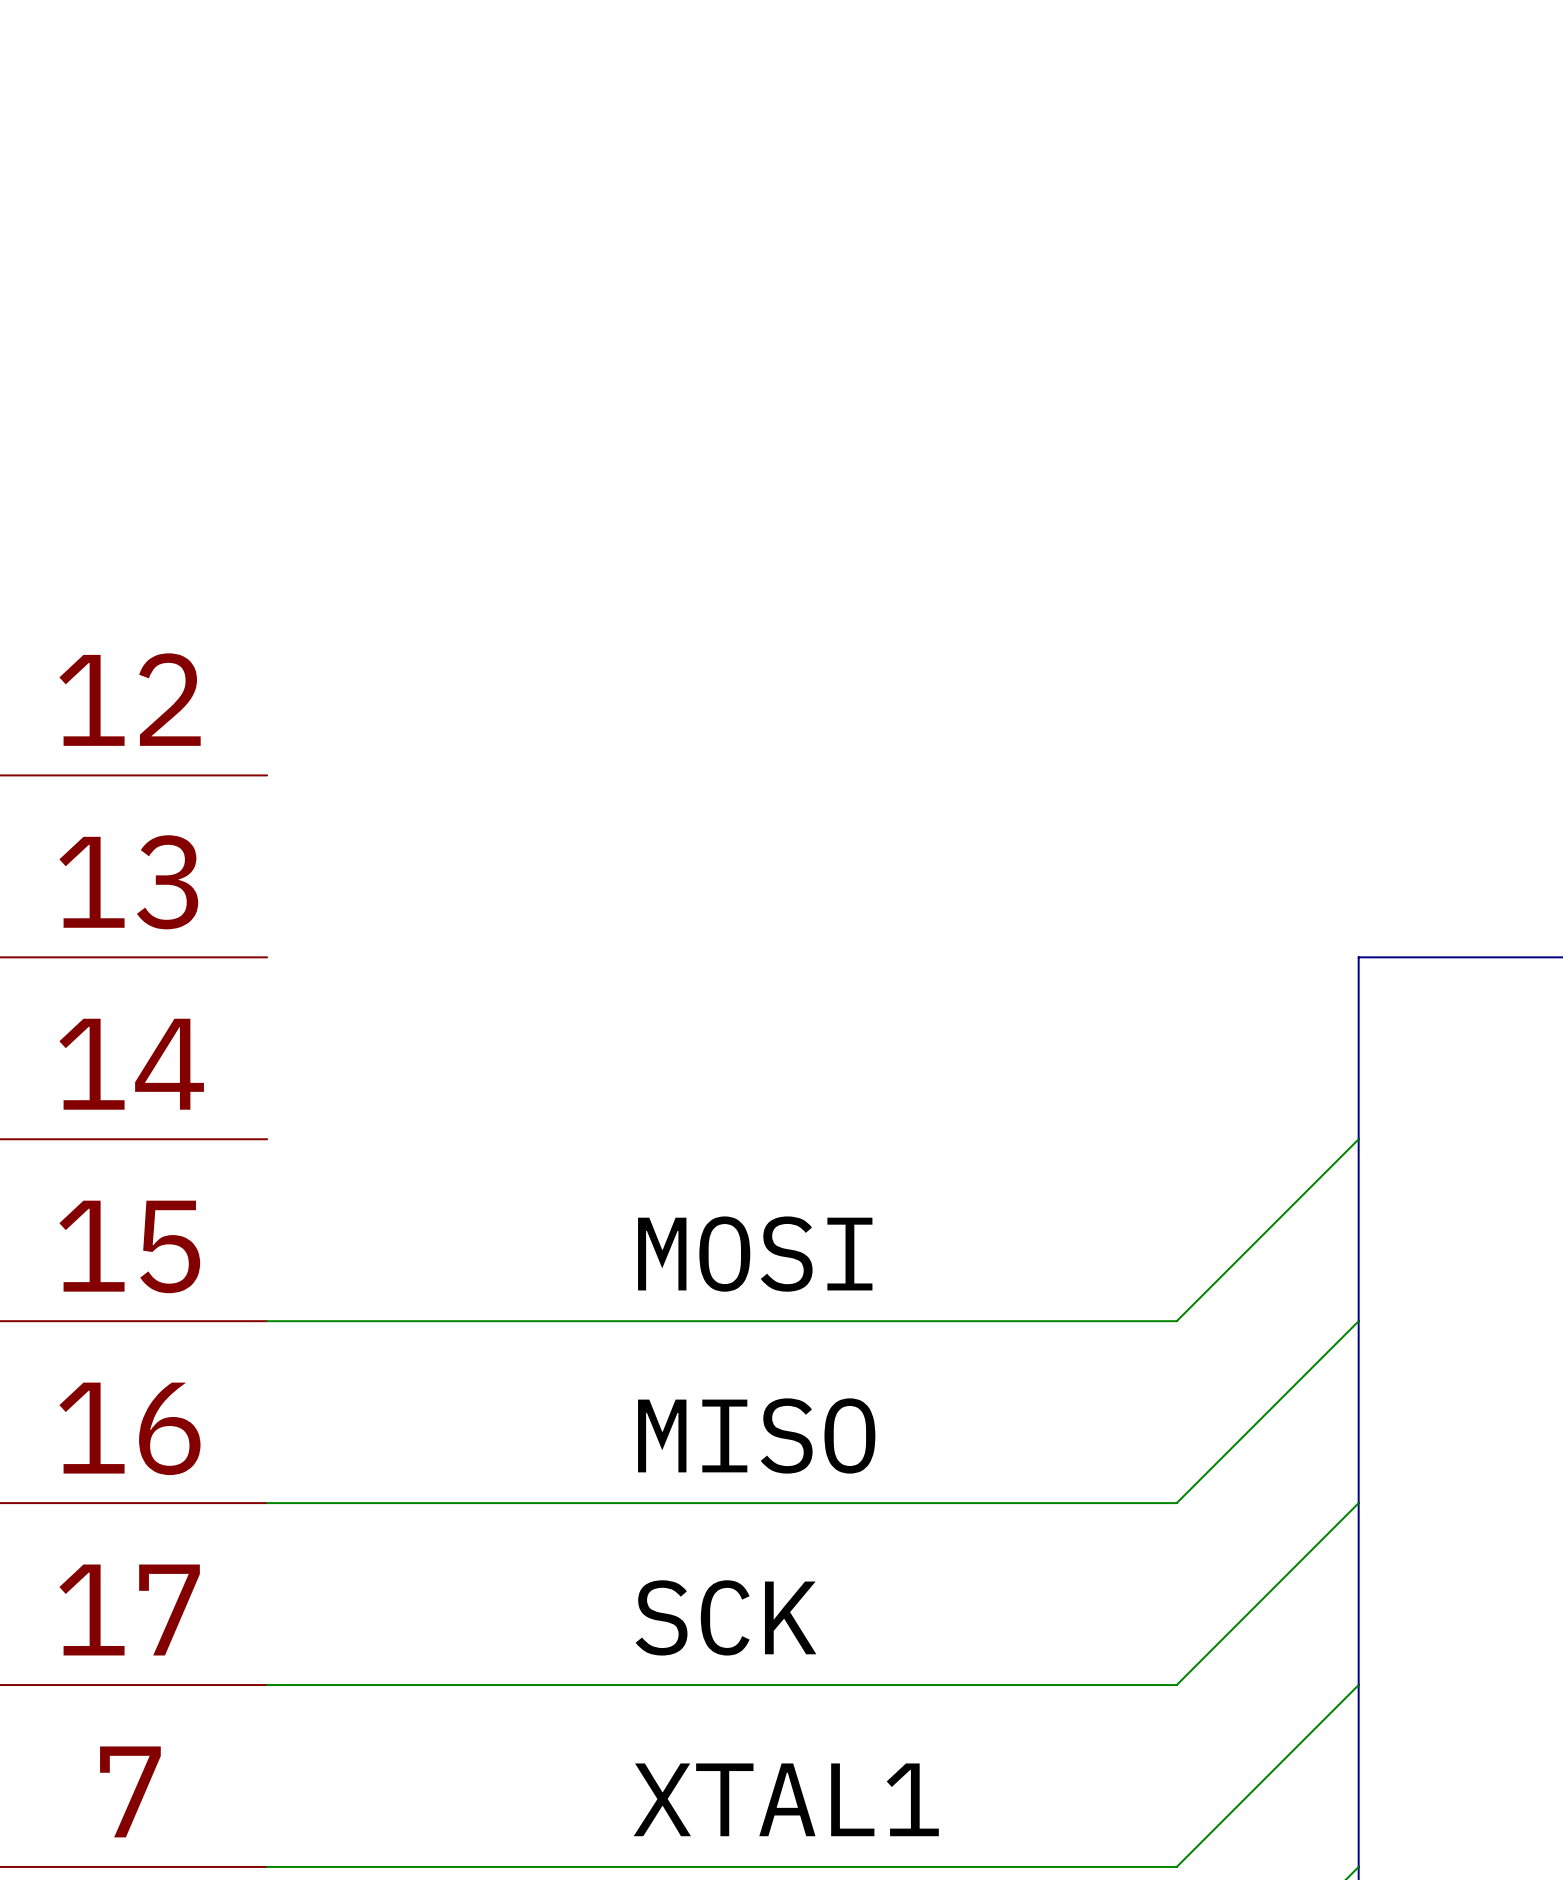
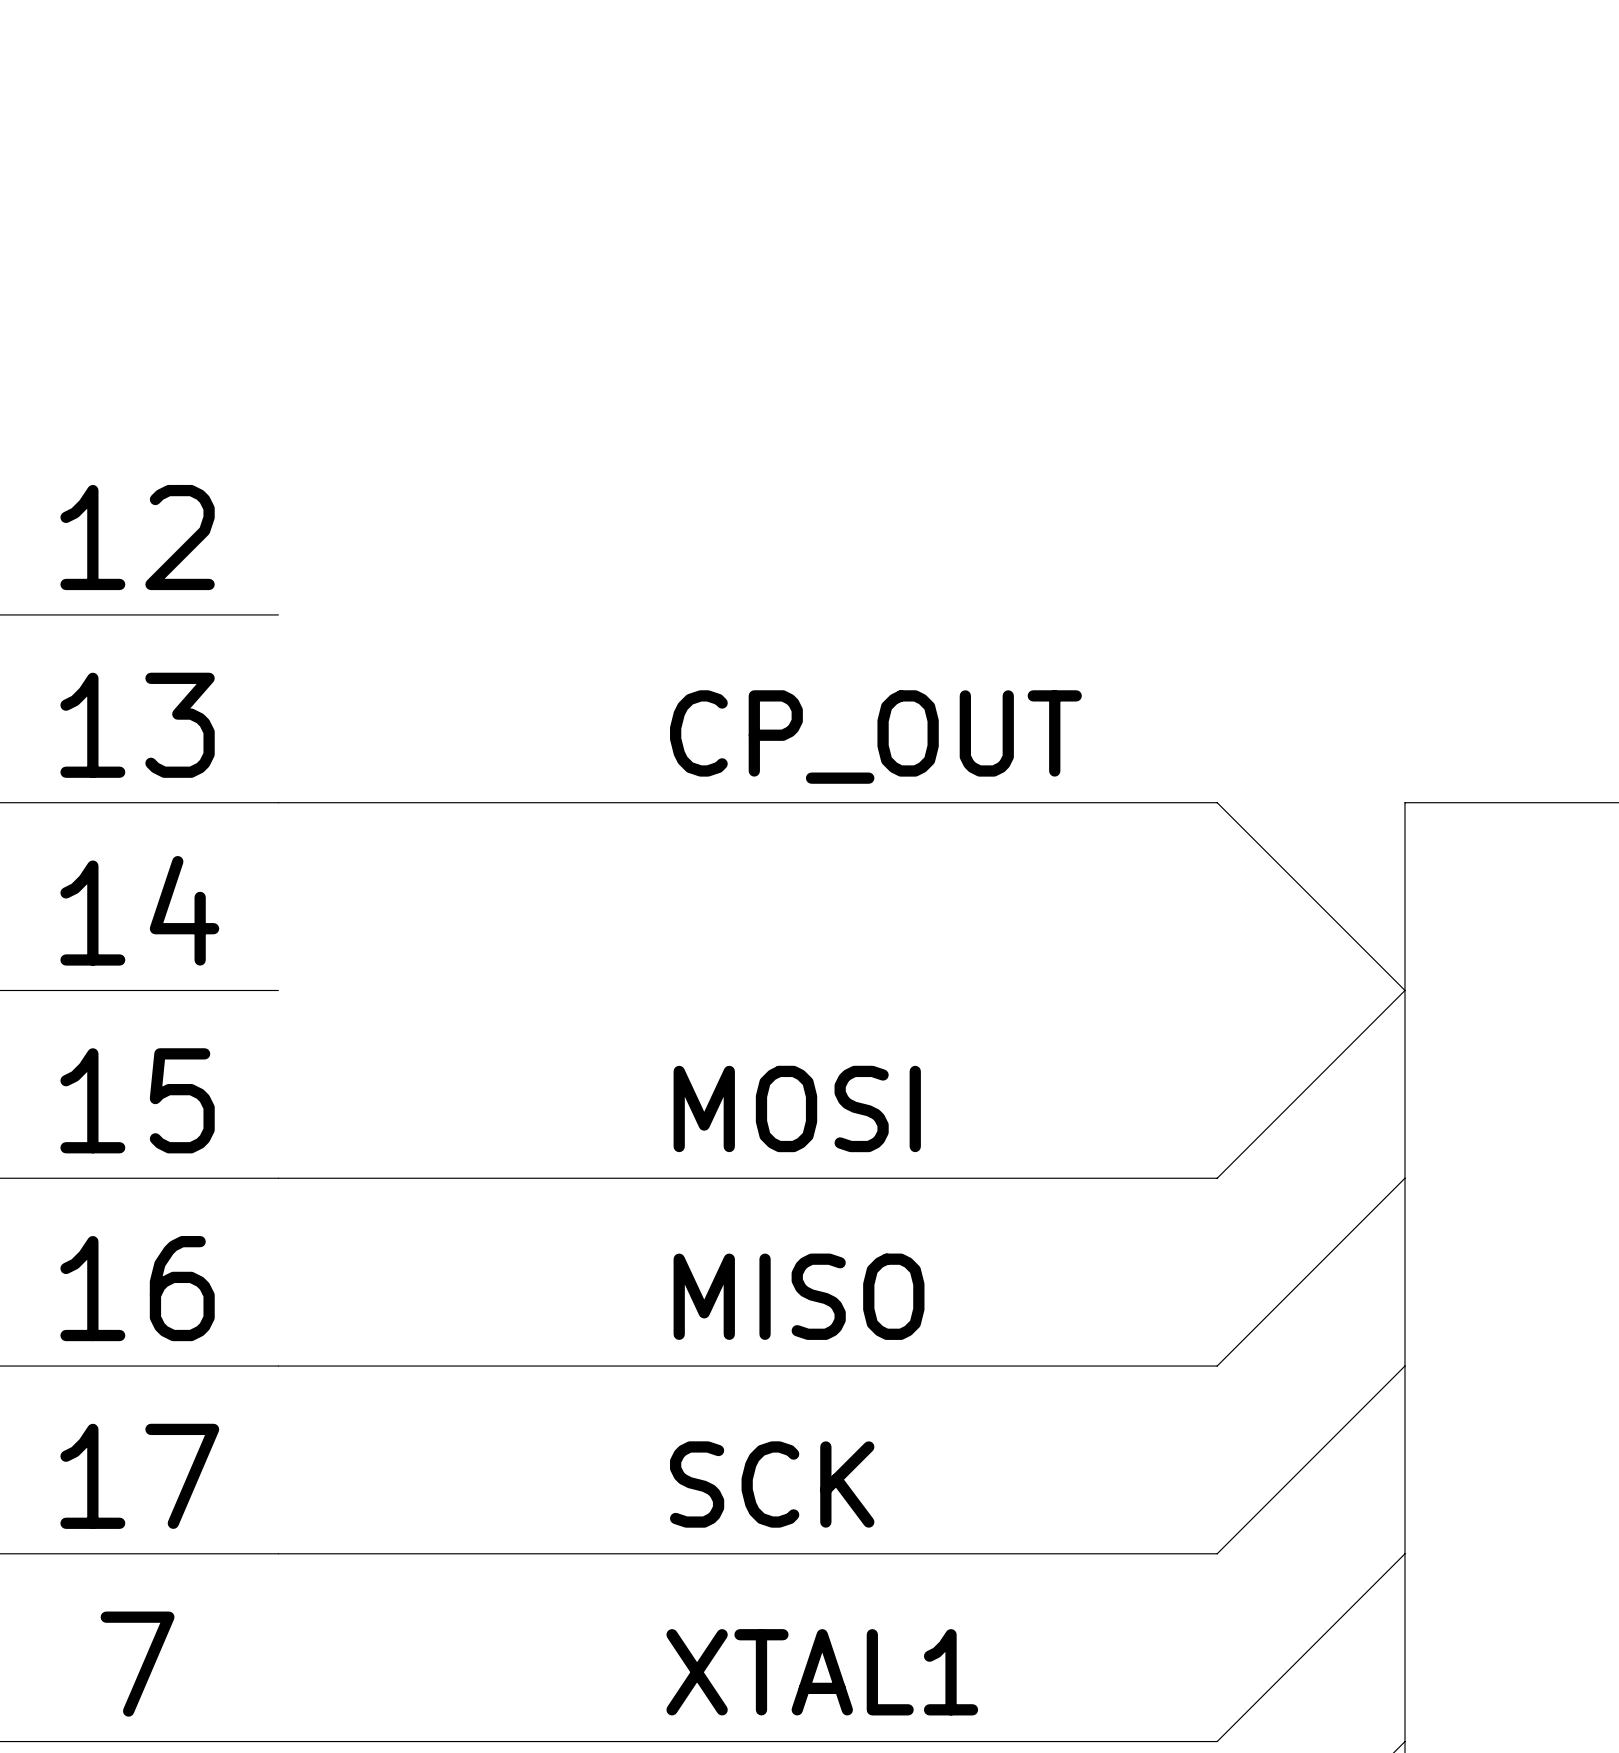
label: none -> CP_OUT (875, 737)
wire: none -> (278, 802) (1217, 802) (1404, 990)

